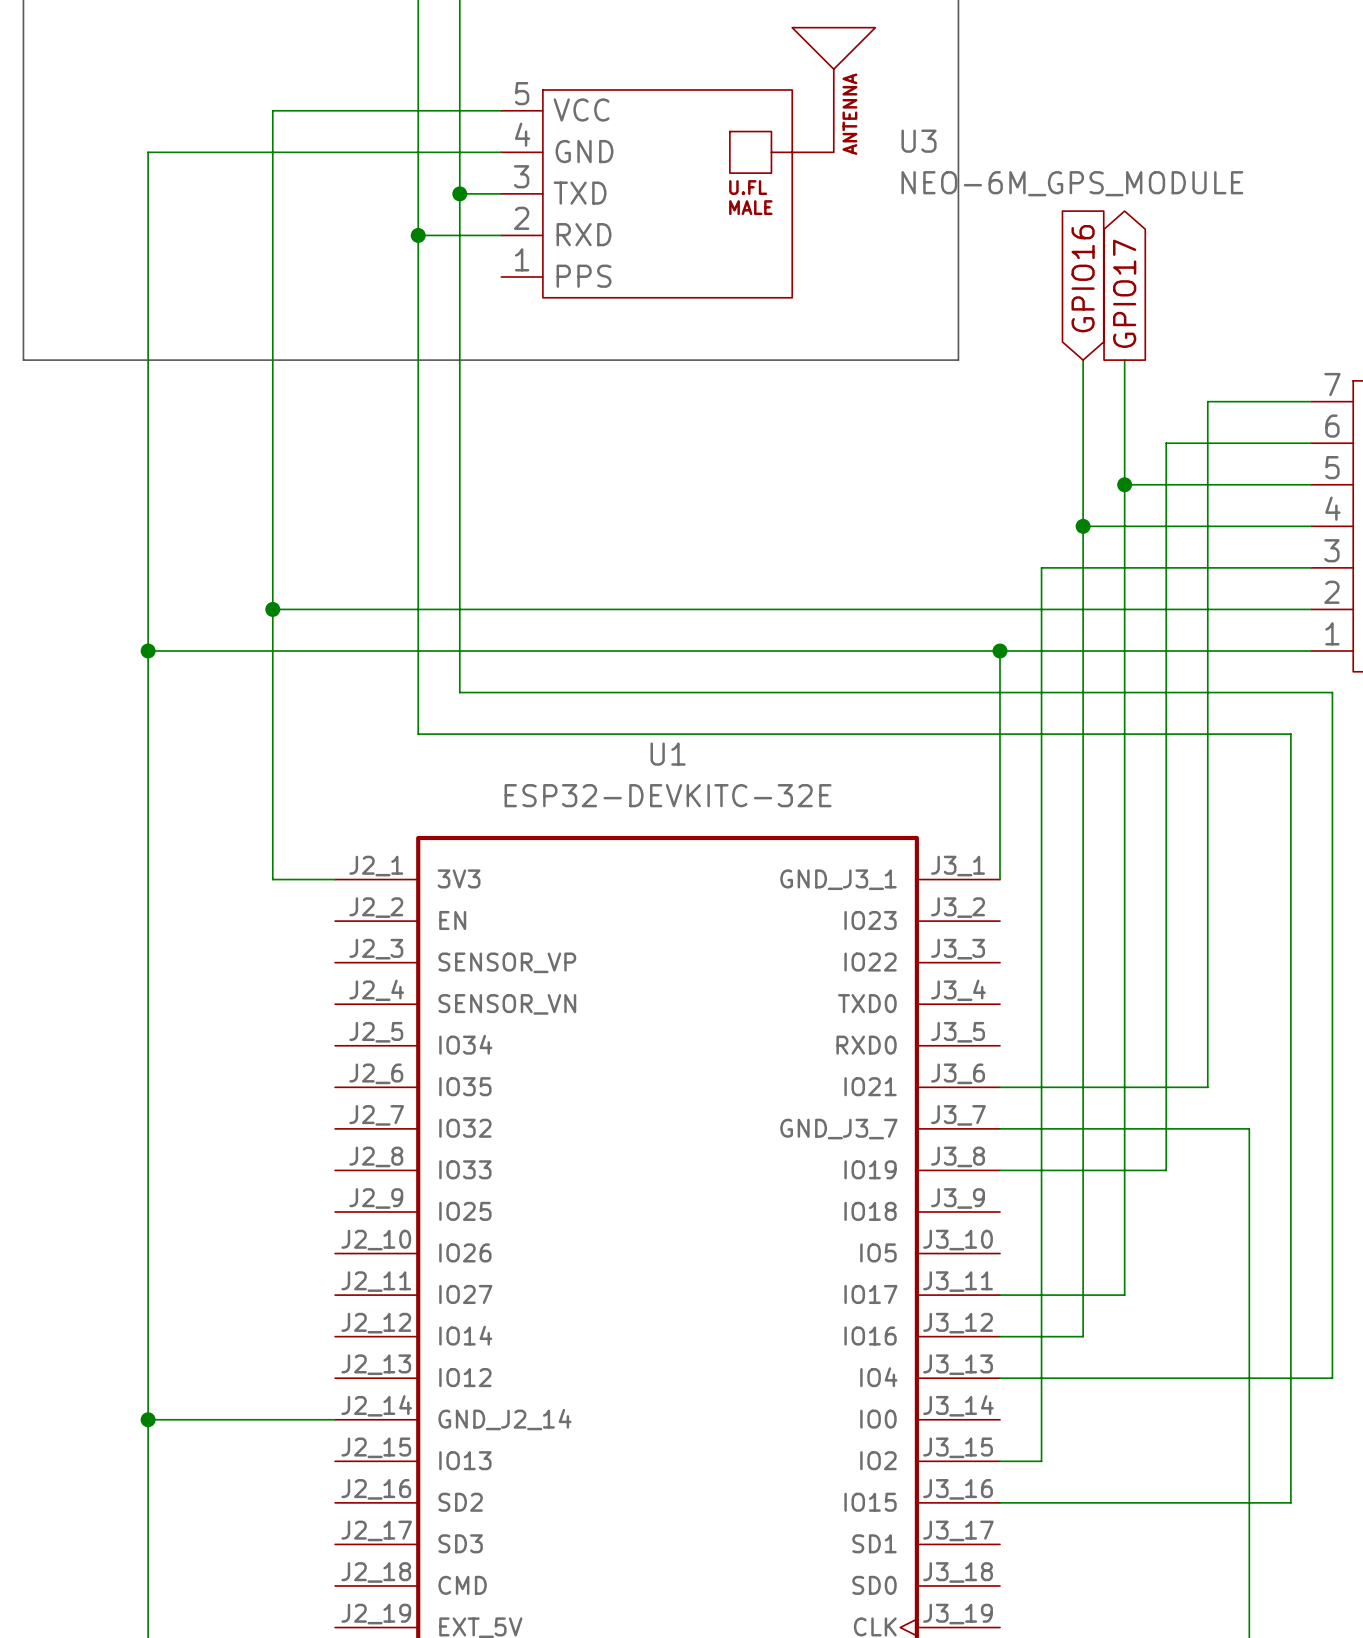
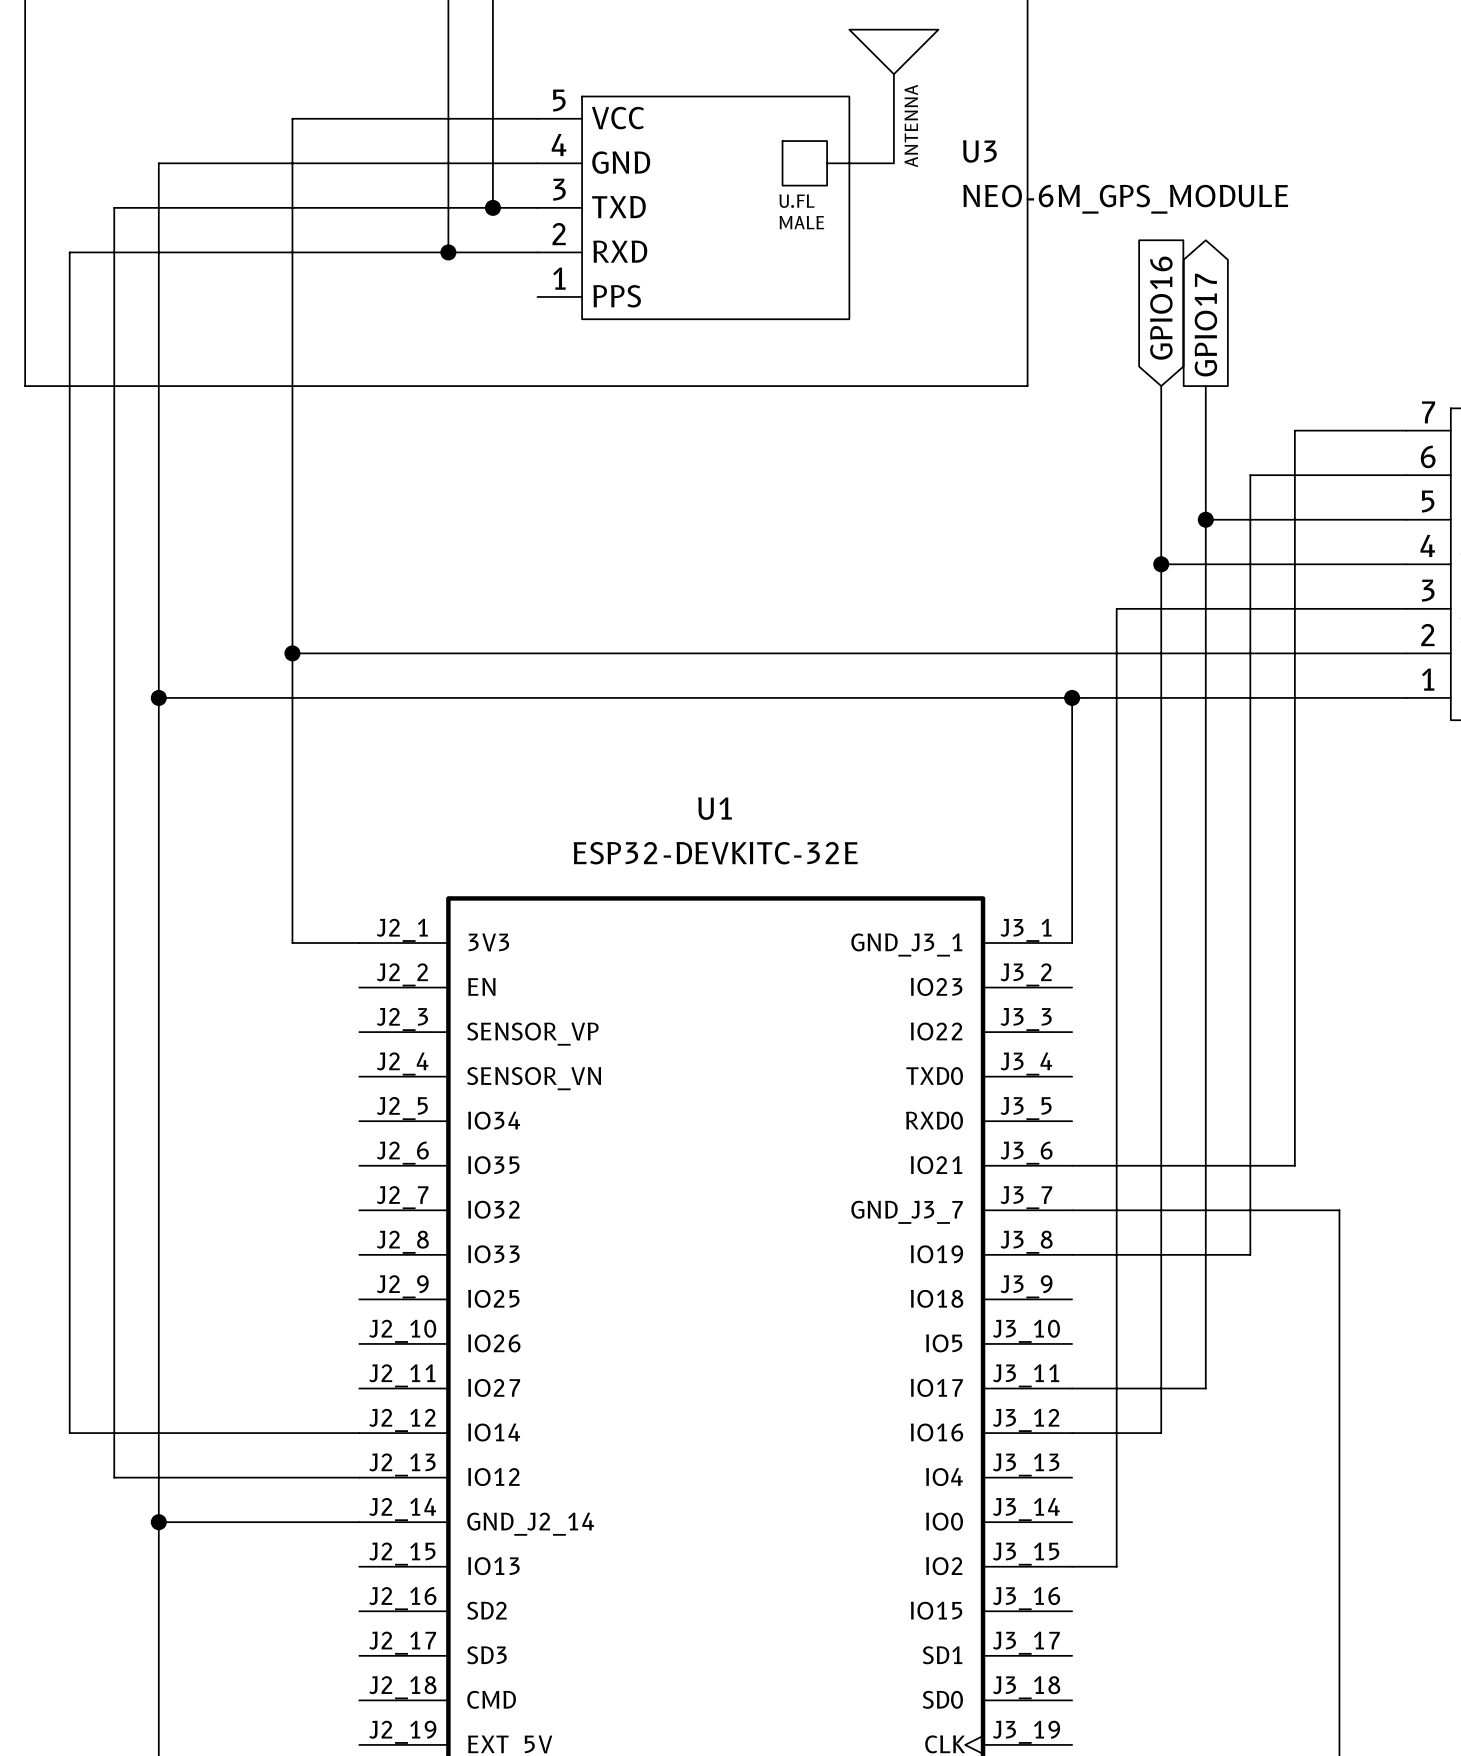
wire: (459, 193) (459, 692) (1332, 692) (1332, 1378) (999, 1378) -> (492, 207) (114, 207) (114, 1477) (359, 1477)
wire: (418, 235) (418, 734) (1290, 734) (1290, 1502) (999, 1502) -> (448, 252) (69, 252) (69, 1433) (359, 1433)

